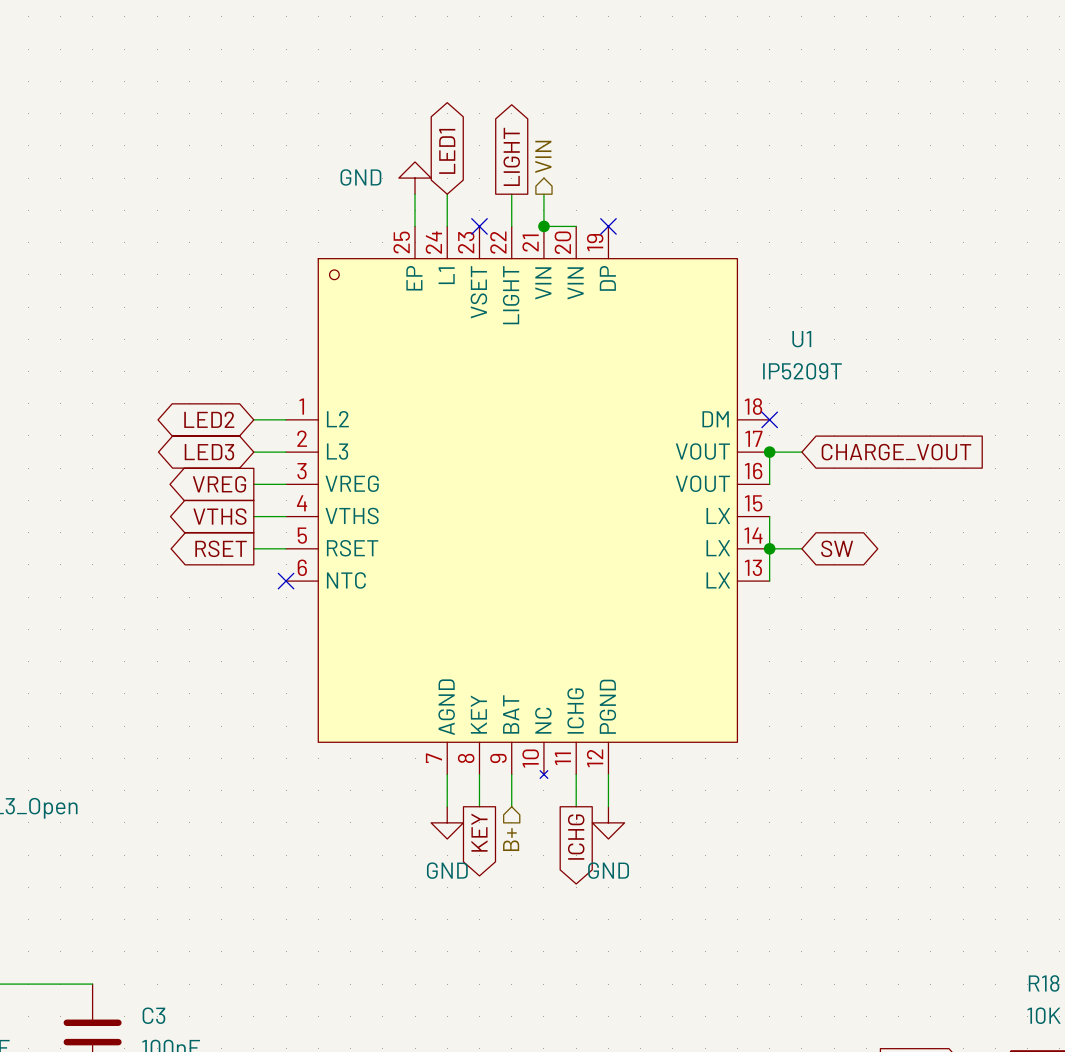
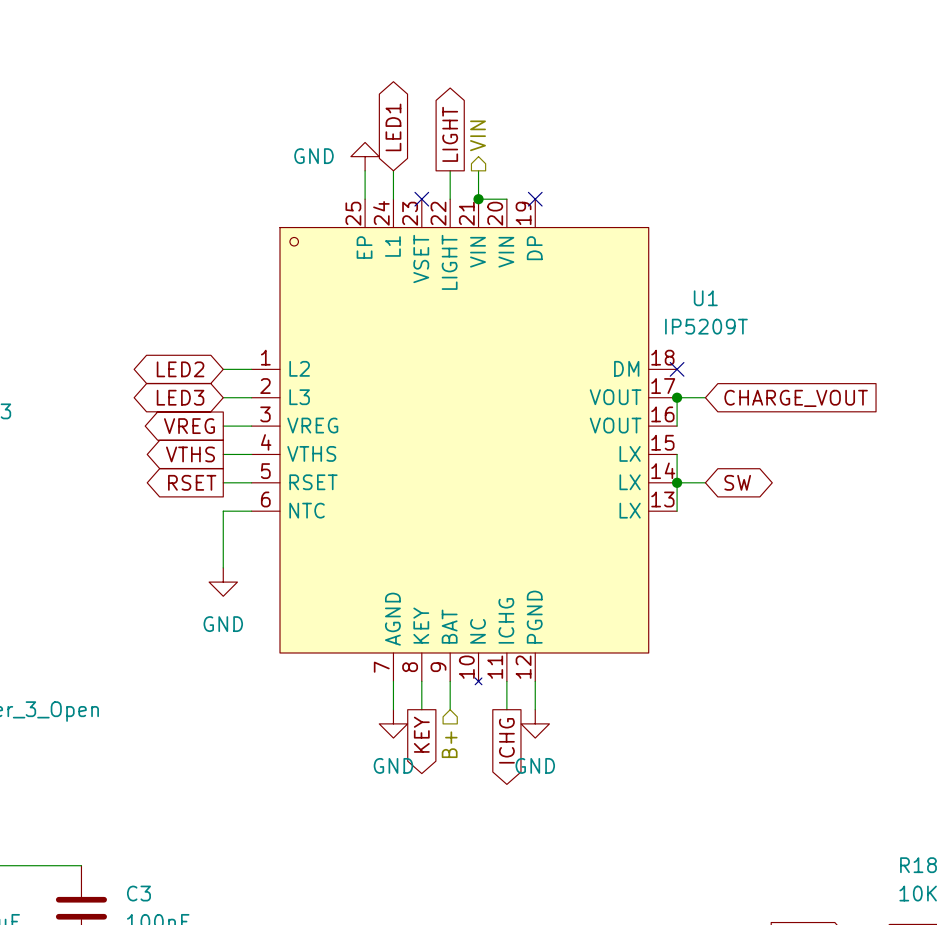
wire: none -> (251, 511) (223, 511) (223, 567)
no-connect mark: (286, 581) -> none
power symbol: none -> GND (223, 582)

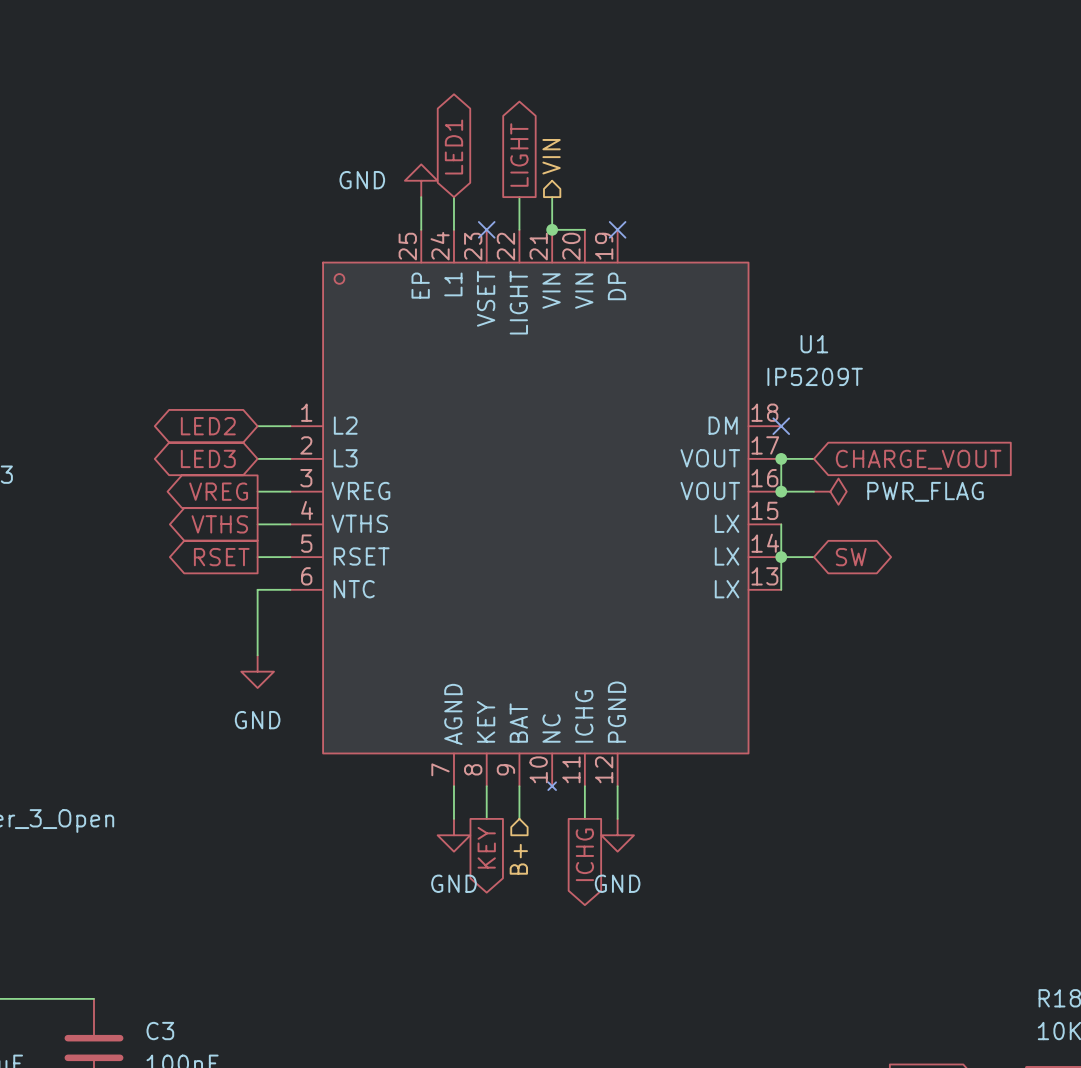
wire: none -> (781, 491) (813, 491)
junction: none -> (781, 491)
power symbol: none -> PWR_FLAG (830, 491)

